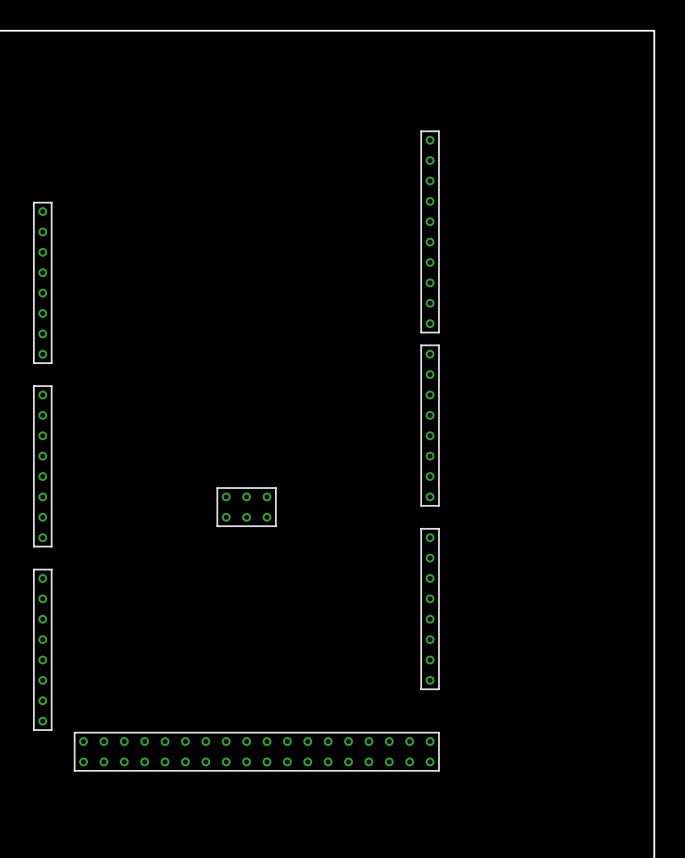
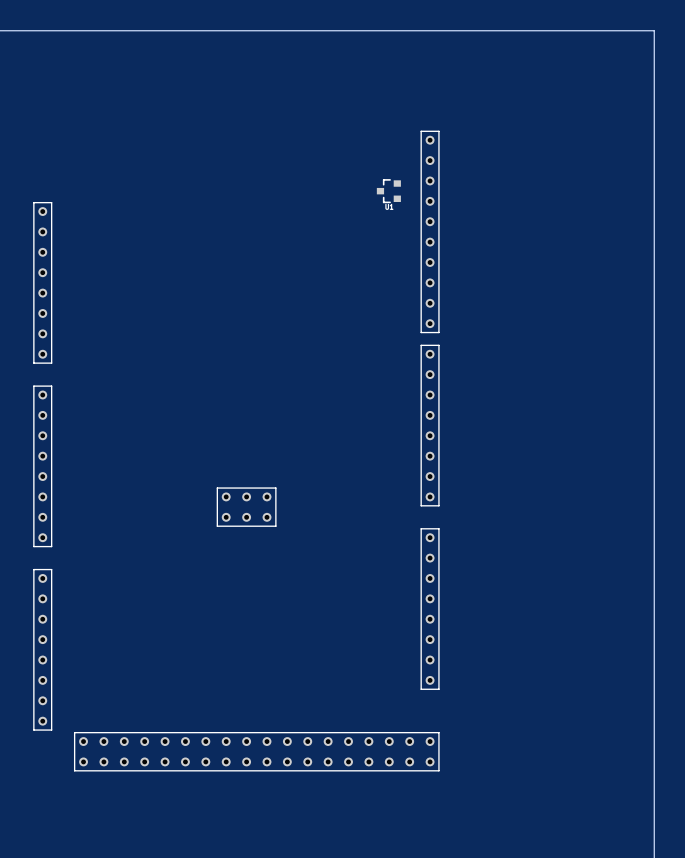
part: none -> (388, 191)

